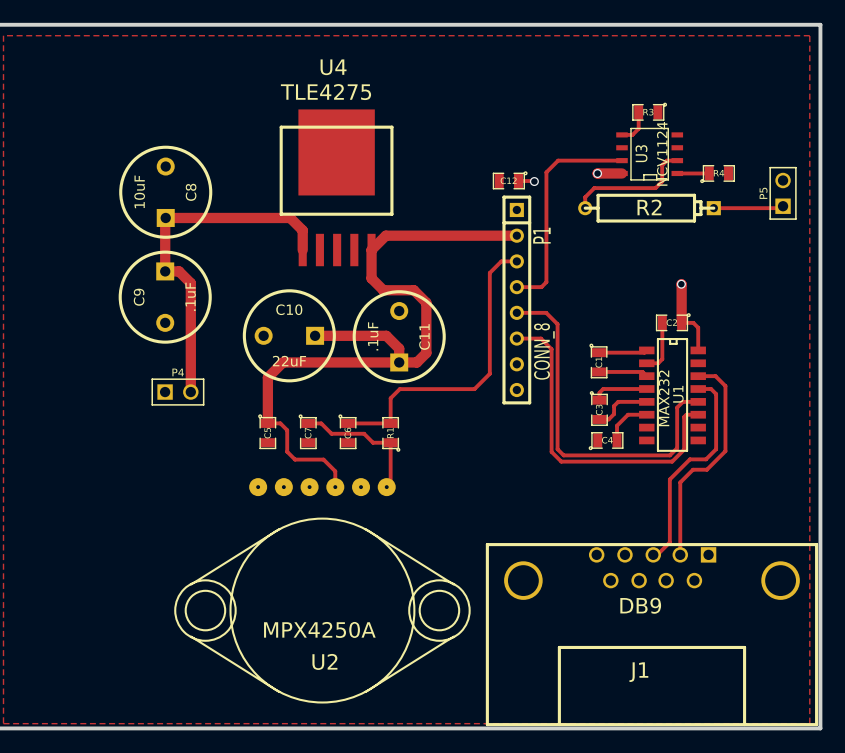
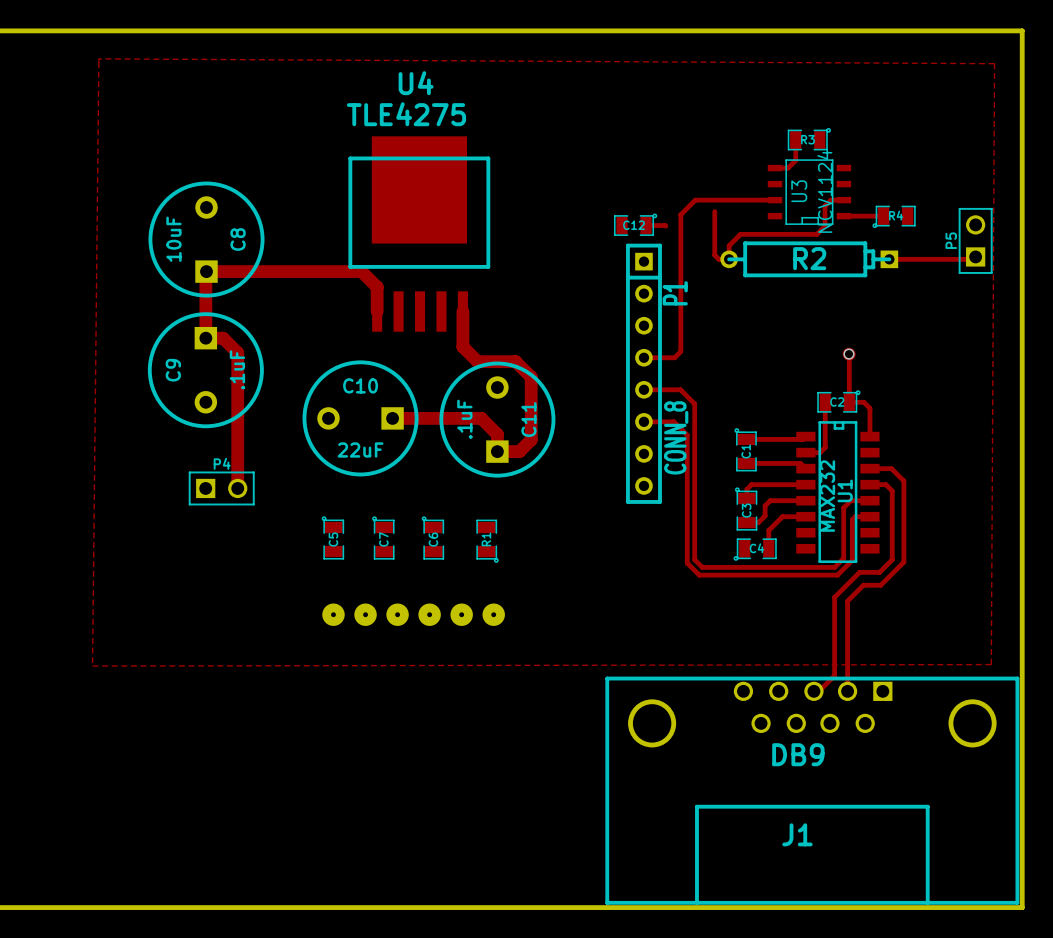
zone outline: (3, 35) (809, 35) (809, 723) (3, 723) (3, 35) -> (98, 58) (92, 666) (991, 664) (994, 63) (98, 58)
track: none -> (714, 211) (714, 255) (718, 259) (729, 259)
track: (597, 173) (621, 173) -> none
via: (597, 173) -> none
via: (534, 181) -> none
track: (516, 235) (385, 235) (371, 250) -> none
track: (516, 261) (501, 261) (489, 272) (489, 373) (474, 389) (399, 389) (390, 398) (390, 423) (348, 423) -> none
track width: thick (681, 284) (681, 322) -> thin (849, 354) (849, 402)
track: (399, 362) (282, 362) (267, 377) (267, 423) (280, 423) (287, 430) (287, 451) (295, 459) (323, 459) (335, 471) (335, 487) -> none
track: (308, 423) (321, 423) (331, 433) (364, 433) (373, 442) (390, 442) (390, 483) (386, 487) -> none
U2 side: top (322, 590) -> bottom (413, 614)

